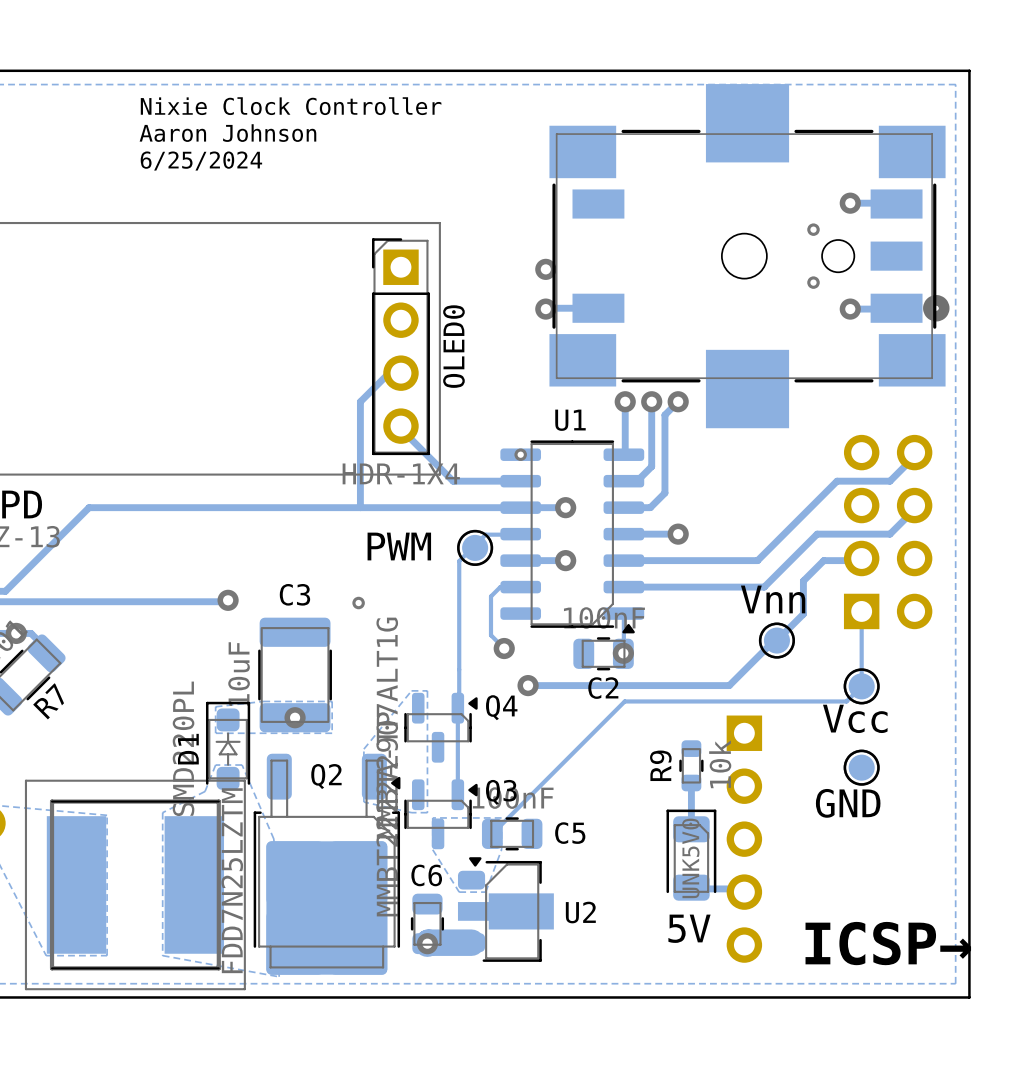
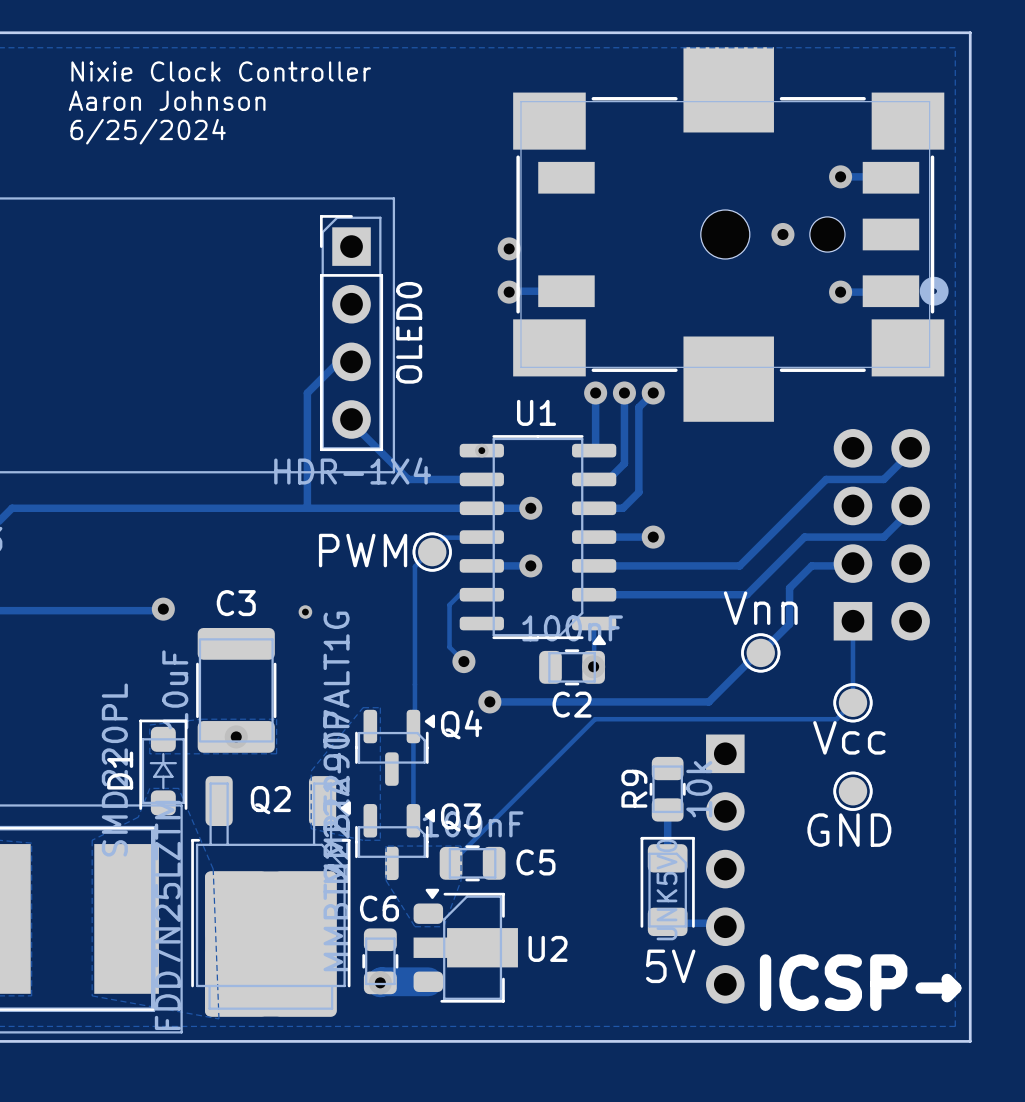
via: (813, 229) -> none
via: none -> (782, 234)
via: (813, 282) -> none
R9 footprint: [679, 740, 704, 792] -> [649, 756, 686, 822]

